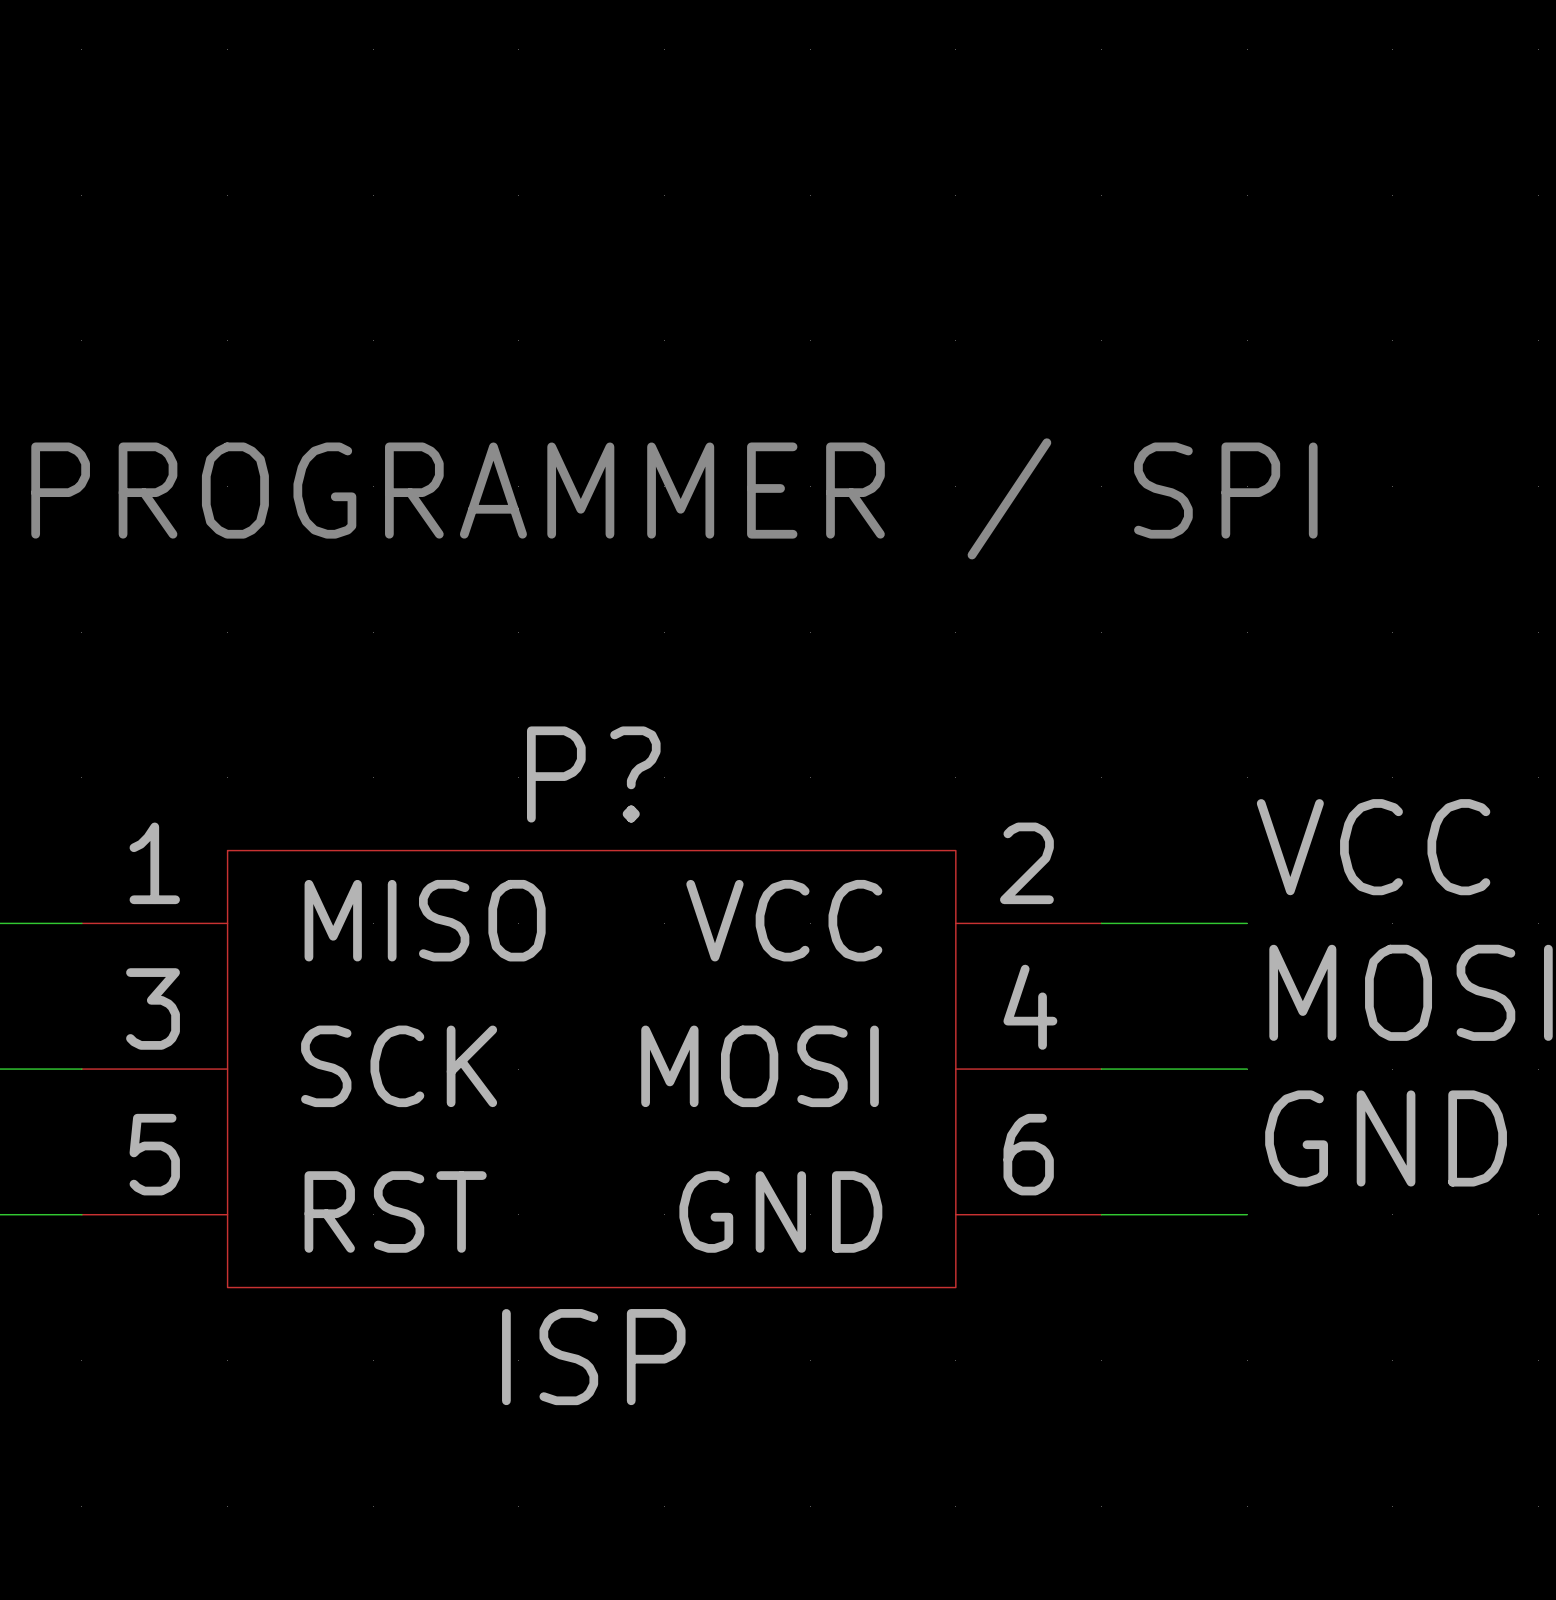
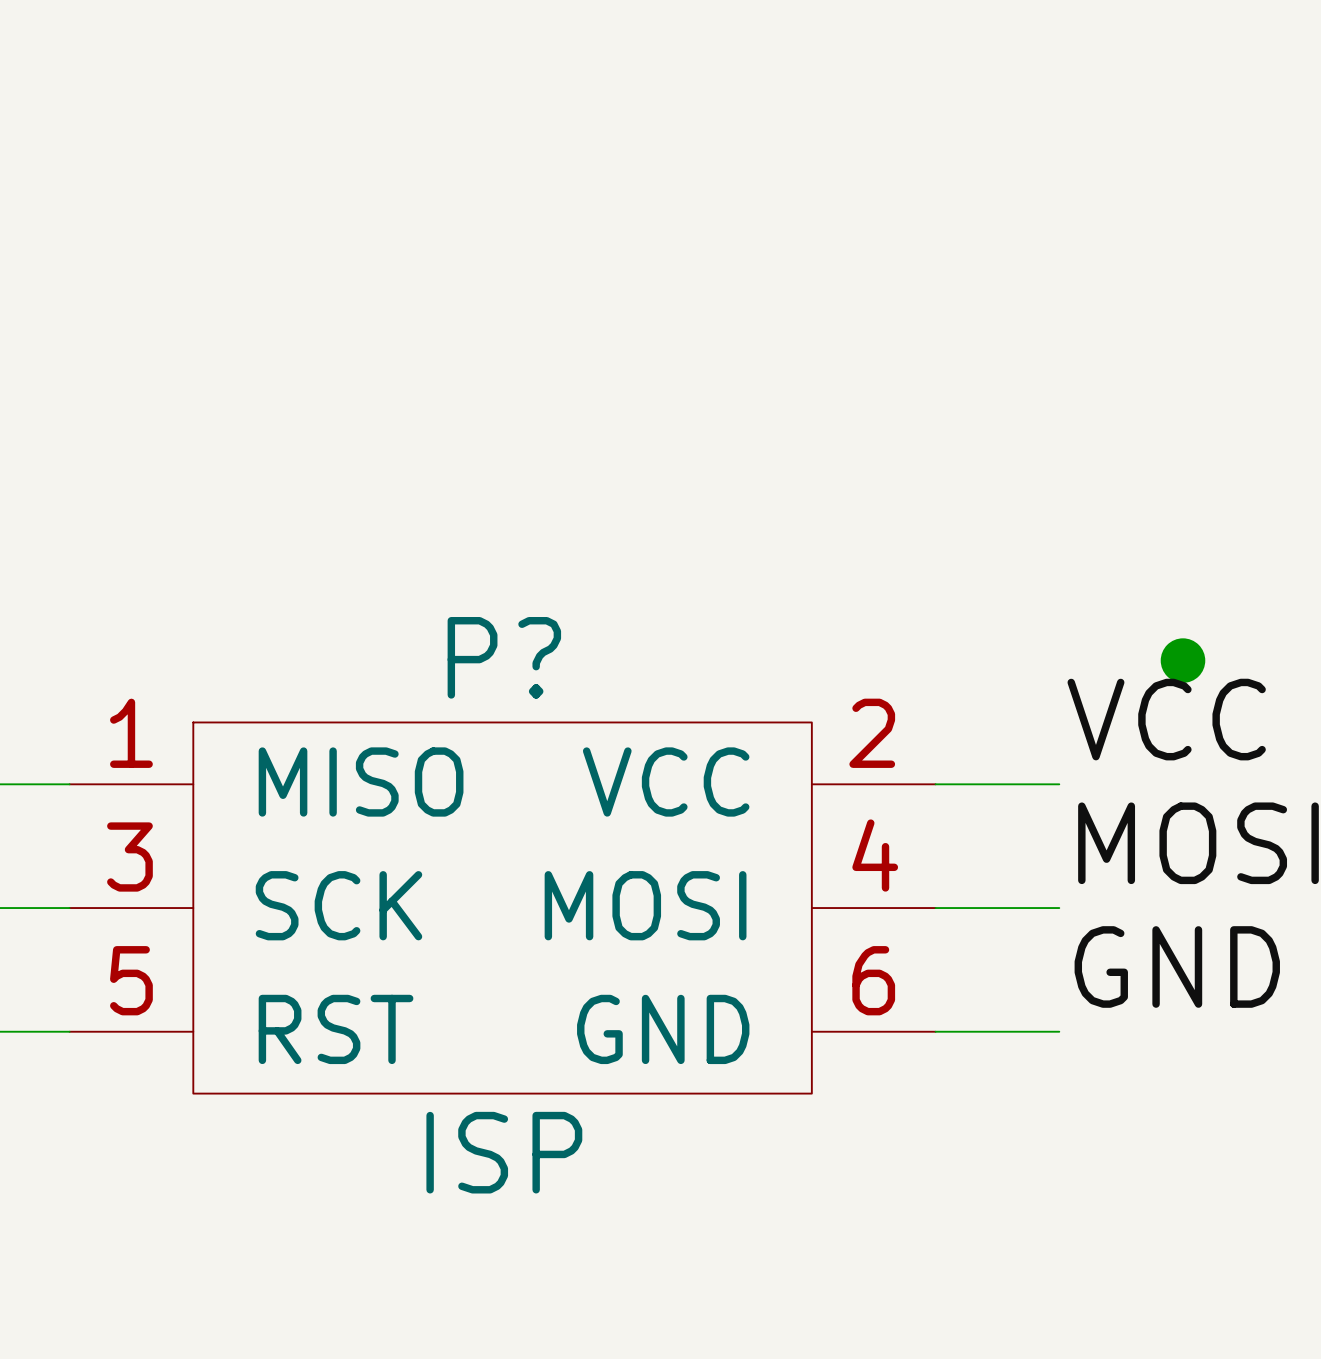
text: PROGRAMMER / SPI (674, 498) -> none
junction: none -> (1183, 660)

